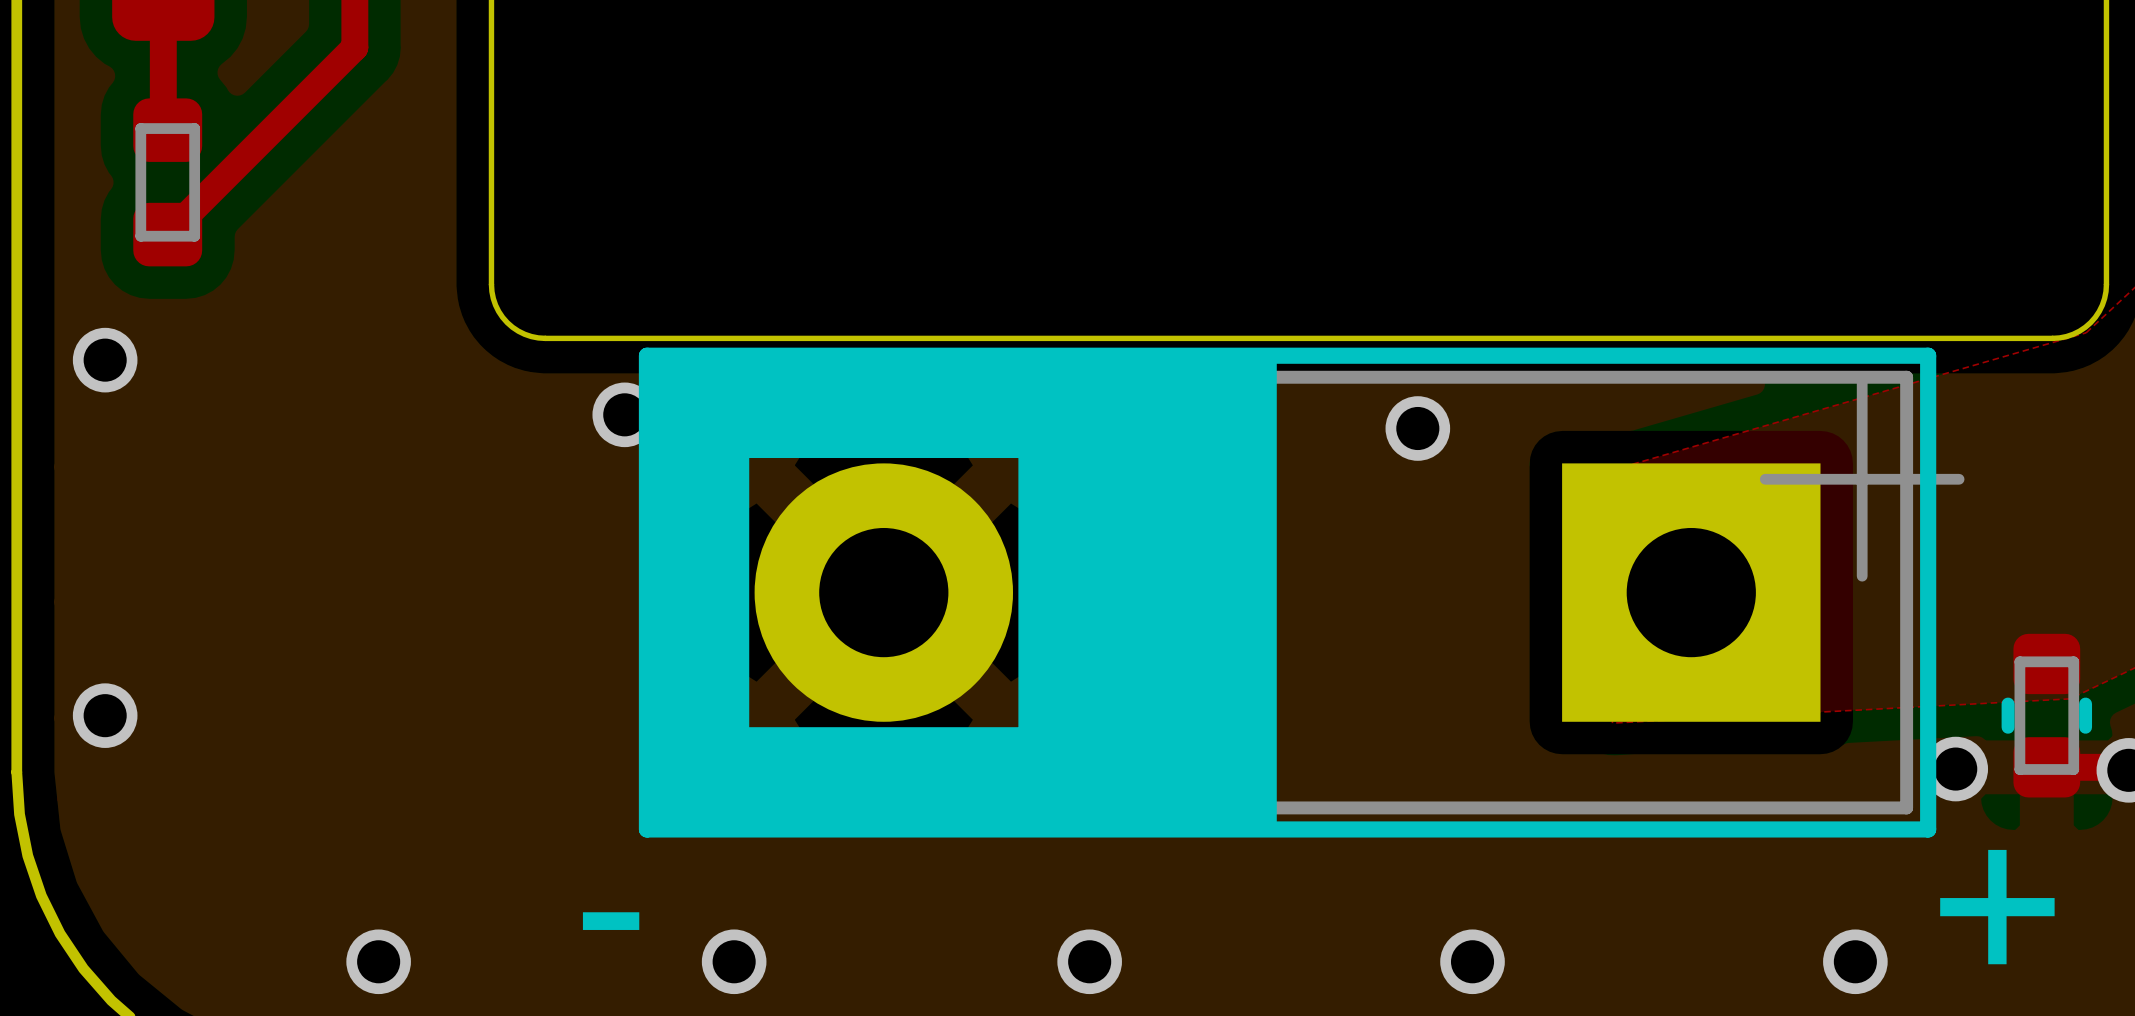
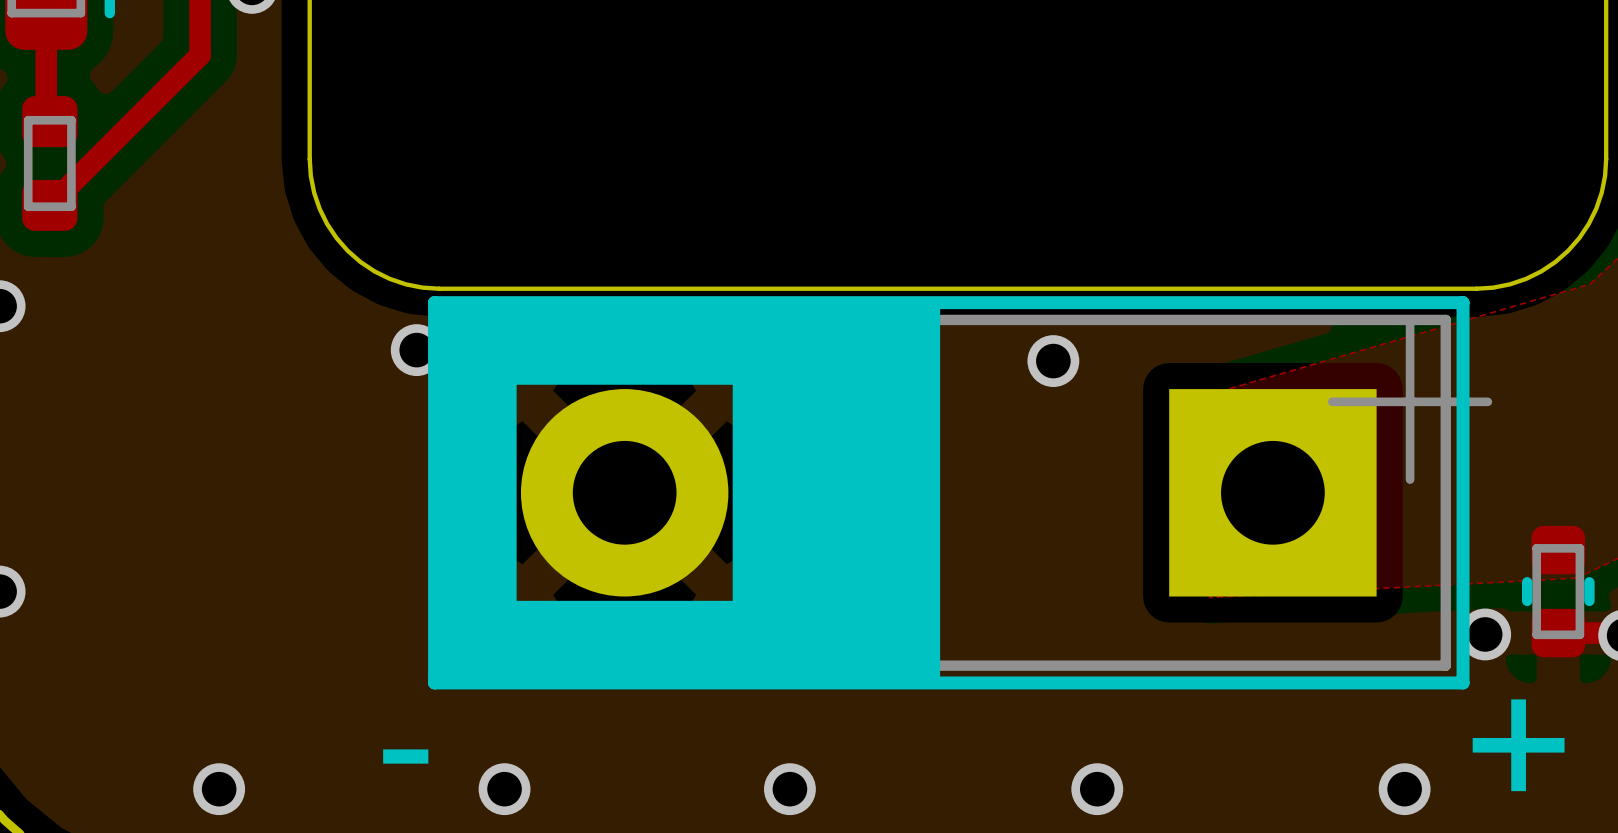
board edge: (491, 176) (491, 291) (495, 305) (507, 322) (518, 331) (538, 337) (652, 338) -> (309, 159) (314, 192) (319, 208) (336, 238) (347, 250) (360, 261) (389, 278) (422, 287) (439, 288)
board edge: (2106, 176) (2105, 291) (2102, 305) (2090, 322) (2079, 331) (2059, 337) (1944, 338) -> (1606, 159) (1601, 192) (1596, 208) (1579, 238) (1568, 250) (1555, 261) (1526, 278) (1493, 287) (1476, 288)

